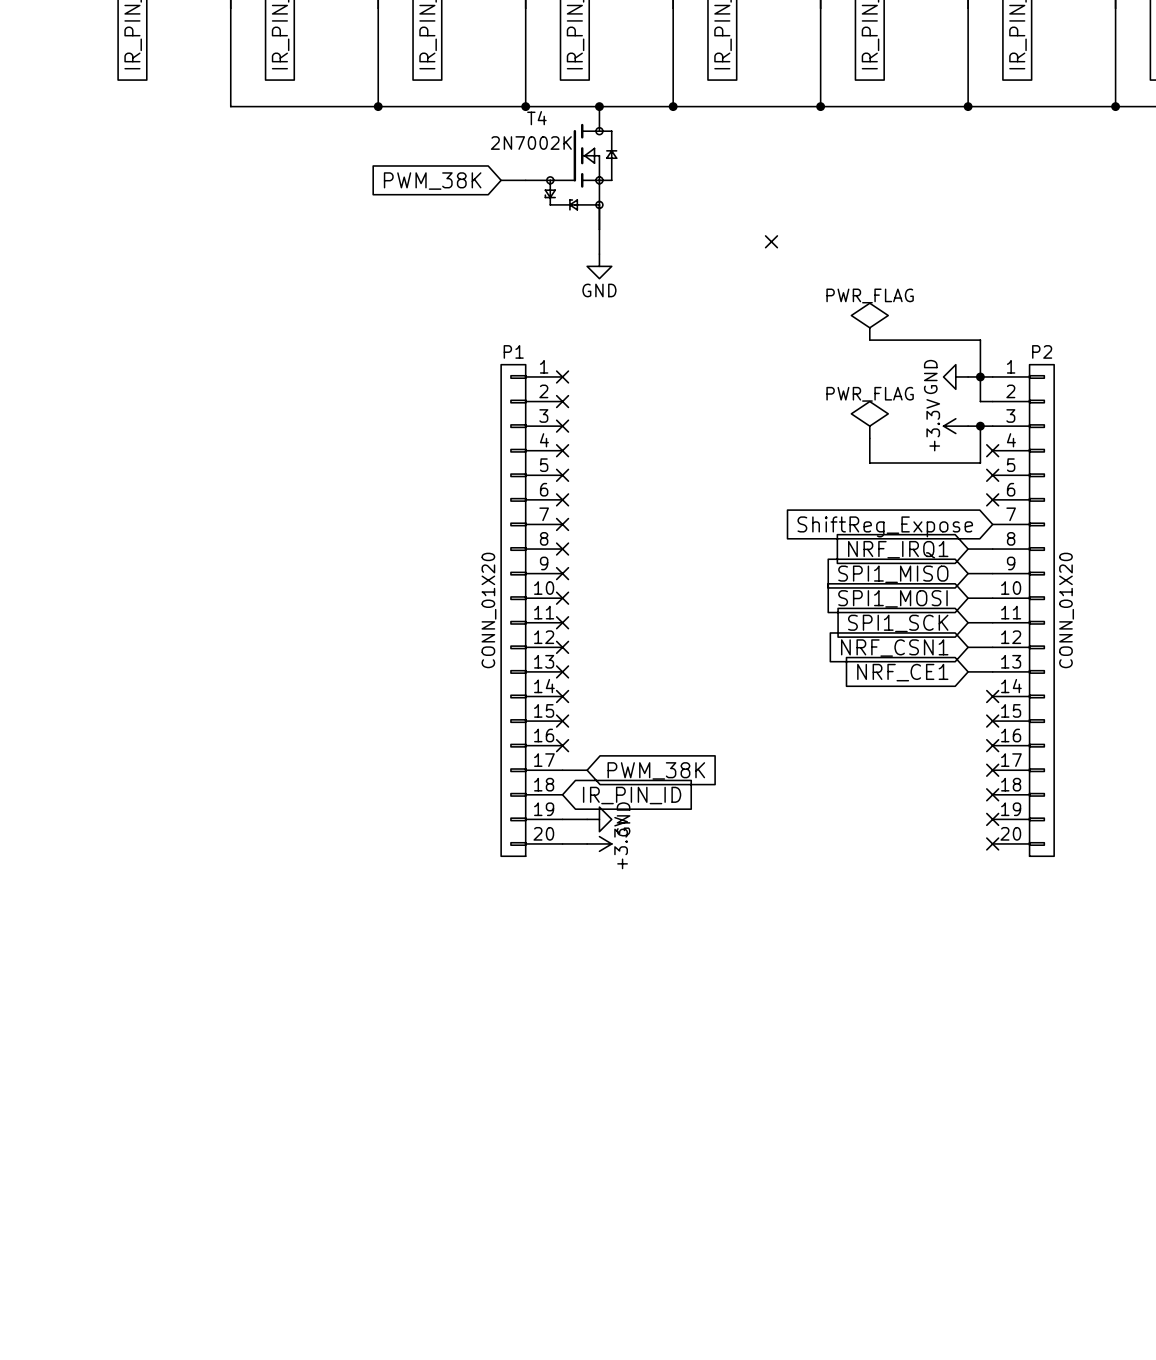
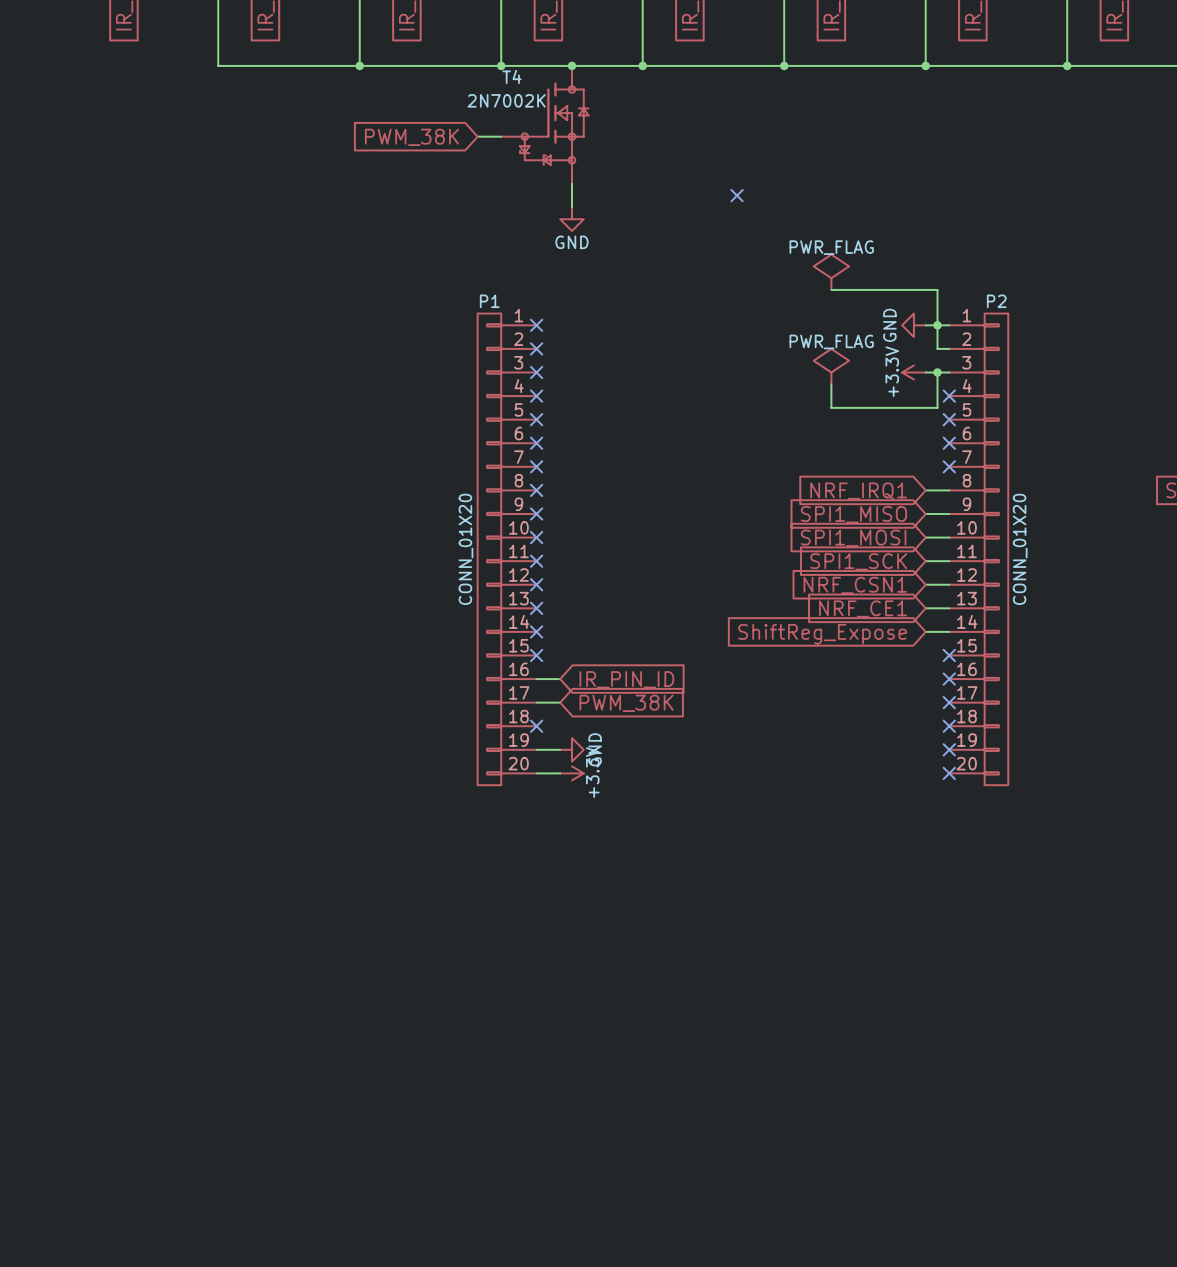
no-connect mark: none -> (949, 466)
global label position: ShiftReg_Expose (885, 526) -> ShiftReg_Expose (822, 634)
wire: none -> (925, 631) (949, 631)
no-connect mark: (992, 696) -> none
wire: none -> (536, 679) (560, 679)
no-connect mark position: (562, 745) -> (536, 726)
global label position: IR_PIN_ID (632, 795) -> IR_PIN_ID (626, 679)

